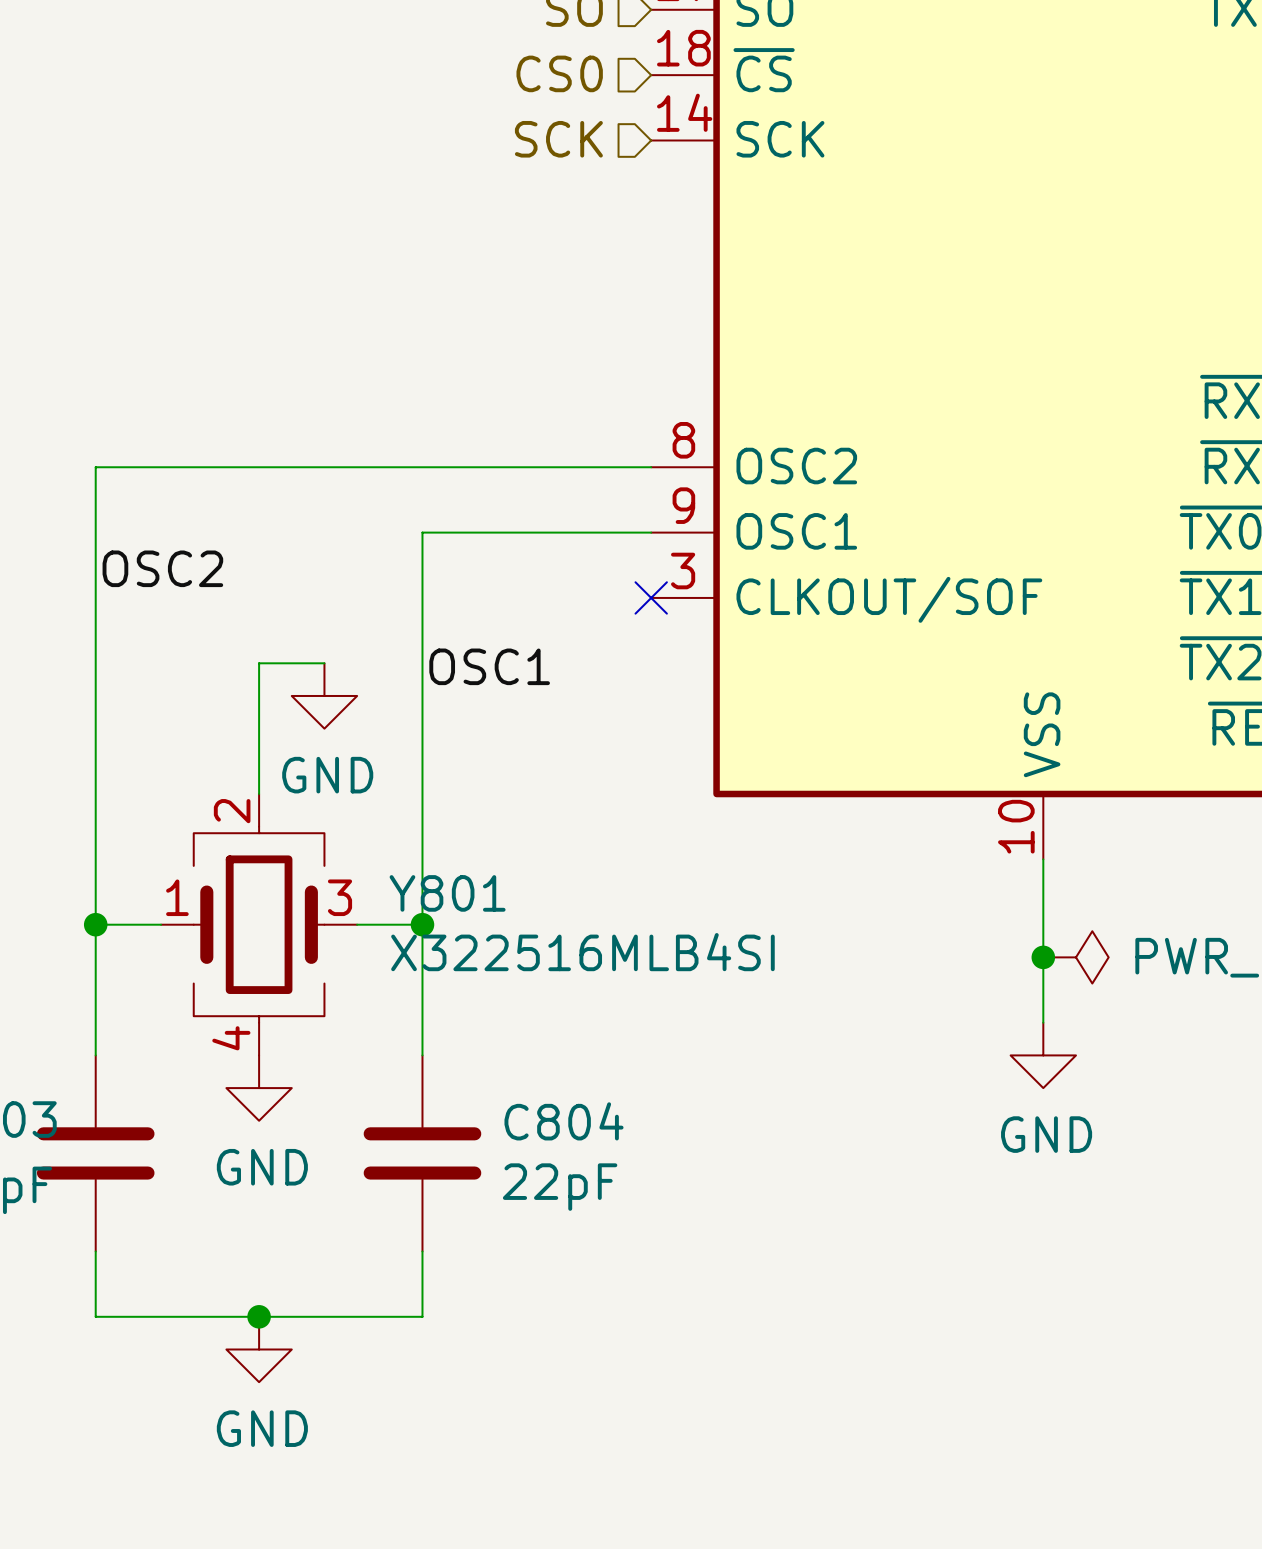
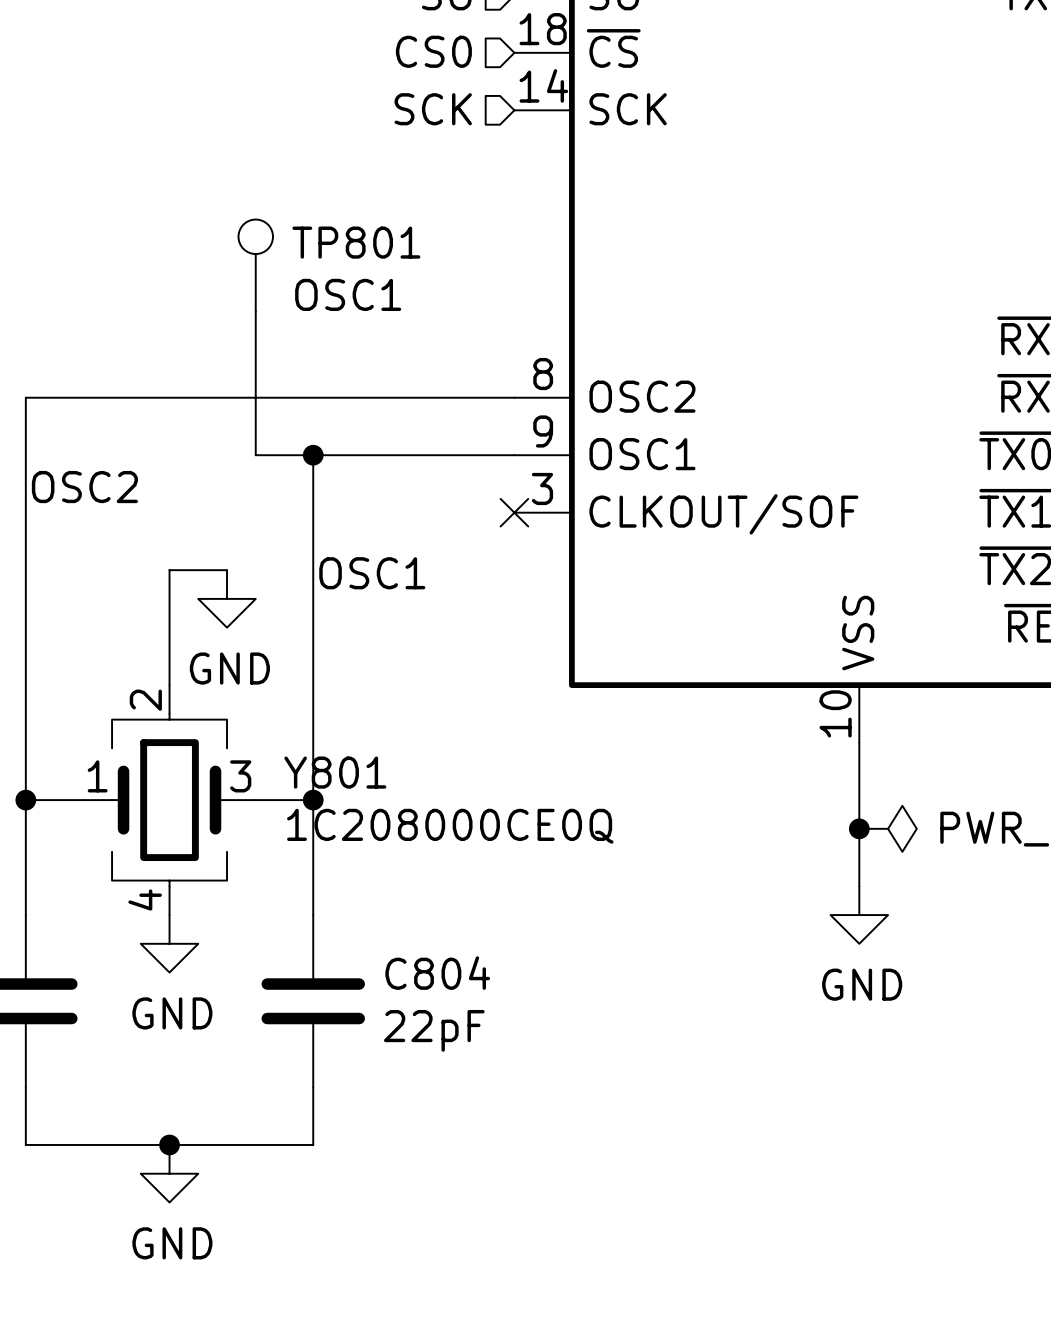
TP801: none -> OSC1 (255, 265)
wire: none -> (255, 311) (255, 455) (313, 455)
junction: none -> (313, 455)
Y801 value: X322516MLB4SI (582, 952) -> 1C208000CE0Q (450, 826)

